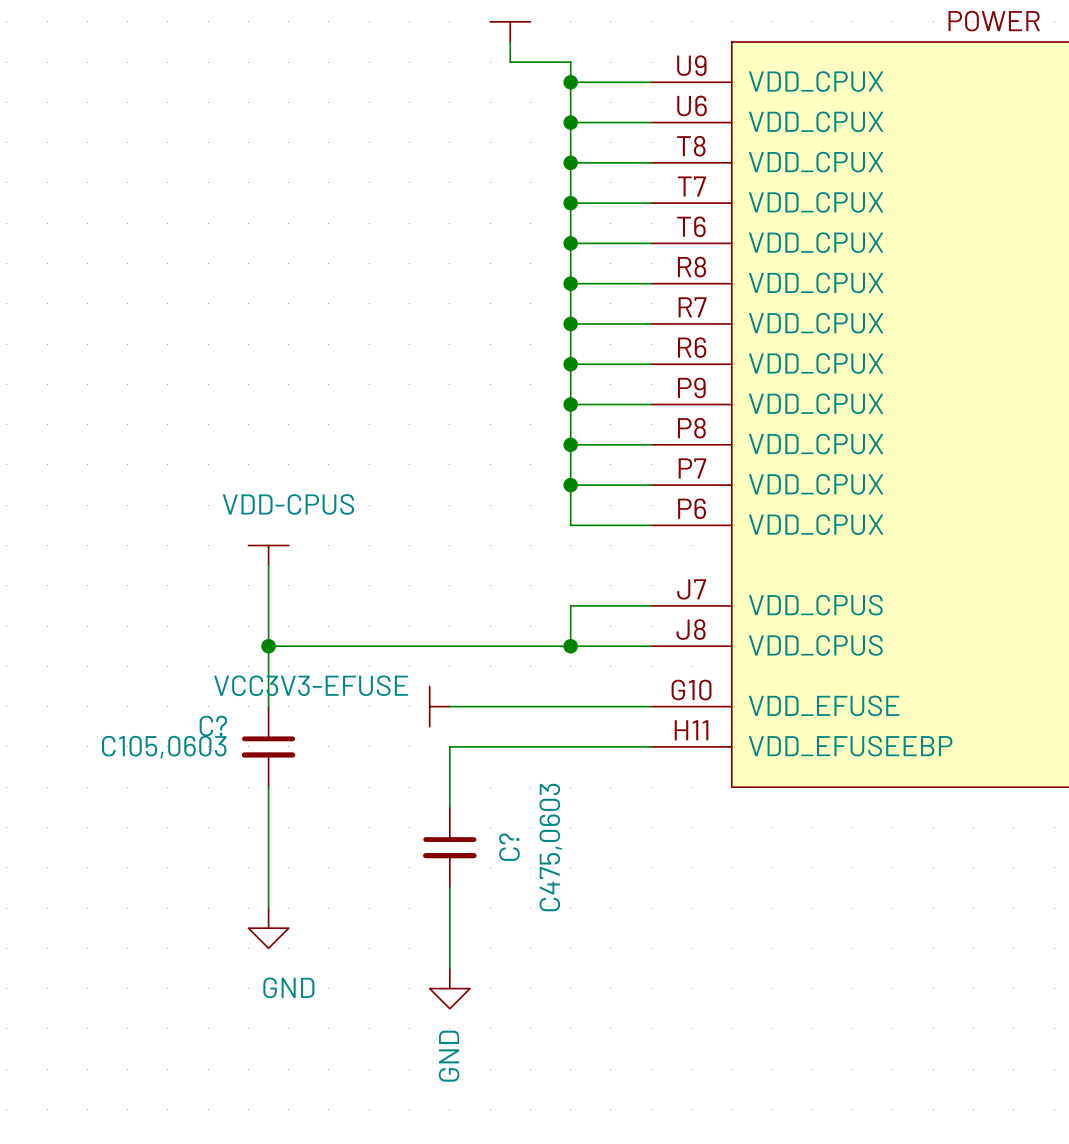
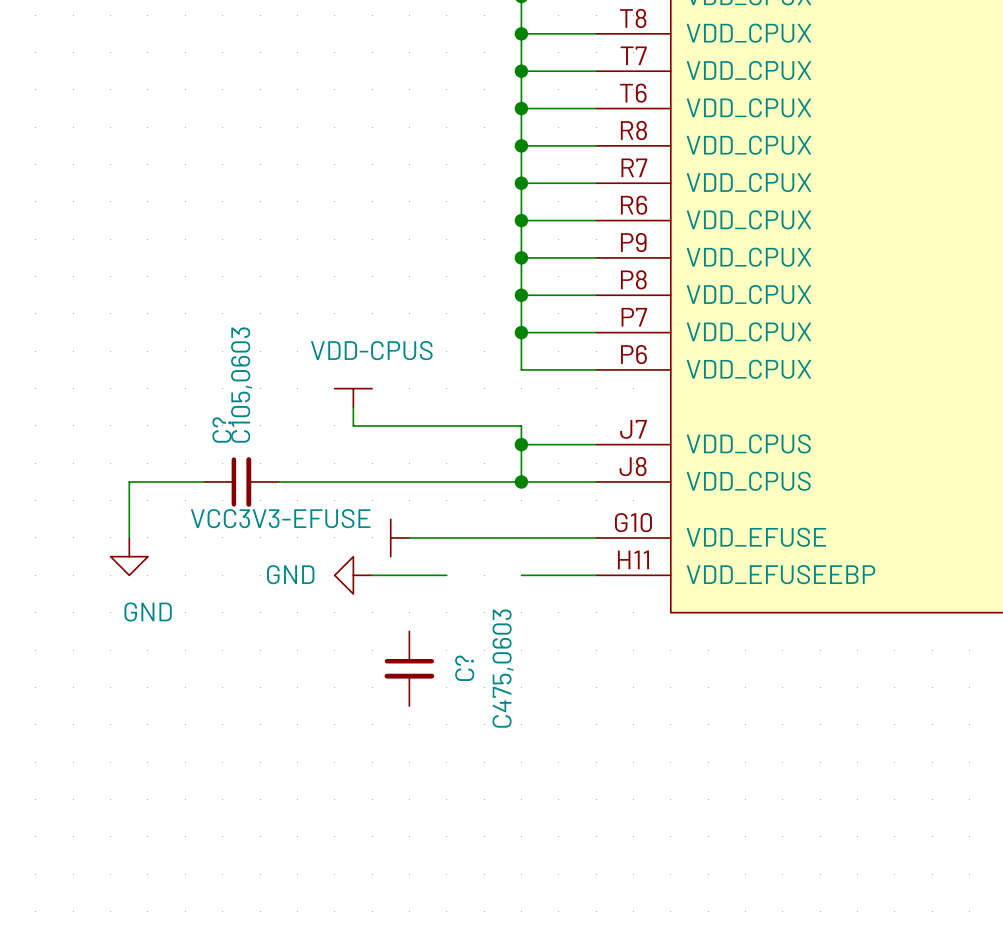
power symbol position: VDD-CPUS (268, 555) -> VDD-CPUS (353, 397)
wire: (268, 565) (268, 706) -> none
wire: none -> (353, 407) (353, 425) (521, 425) (521, 444)
junction: none -> (521, 444)
wire: none -> (204, 481) (129, 481) (129, 537)
junction: (268, 646) -> none
power symbol: none -> GND (129, 556)
C? name position: C? (213, 726) -> C? (221, 430)
C? position: (268, 746) -> (241, 481)
power symbol: none -> GND (353, 575)
wire: (449, 746) (449, 807) -> (409, 575) (372, 575)
wire: (490, 746) (570, 746) -> none
C? value position: C105,0603 (164, 747) -> C105,0603 (241, 385)
C? rotation: 0° (268, 747) -> 90° counterclockwise (241, 481)
wire: (268, 787) (268, 908) -> none
wire: (449, 887) (449, 968) -> none
power symbol: GND (268, 928) -> none
power symbol: GND (449, 988) -> none

